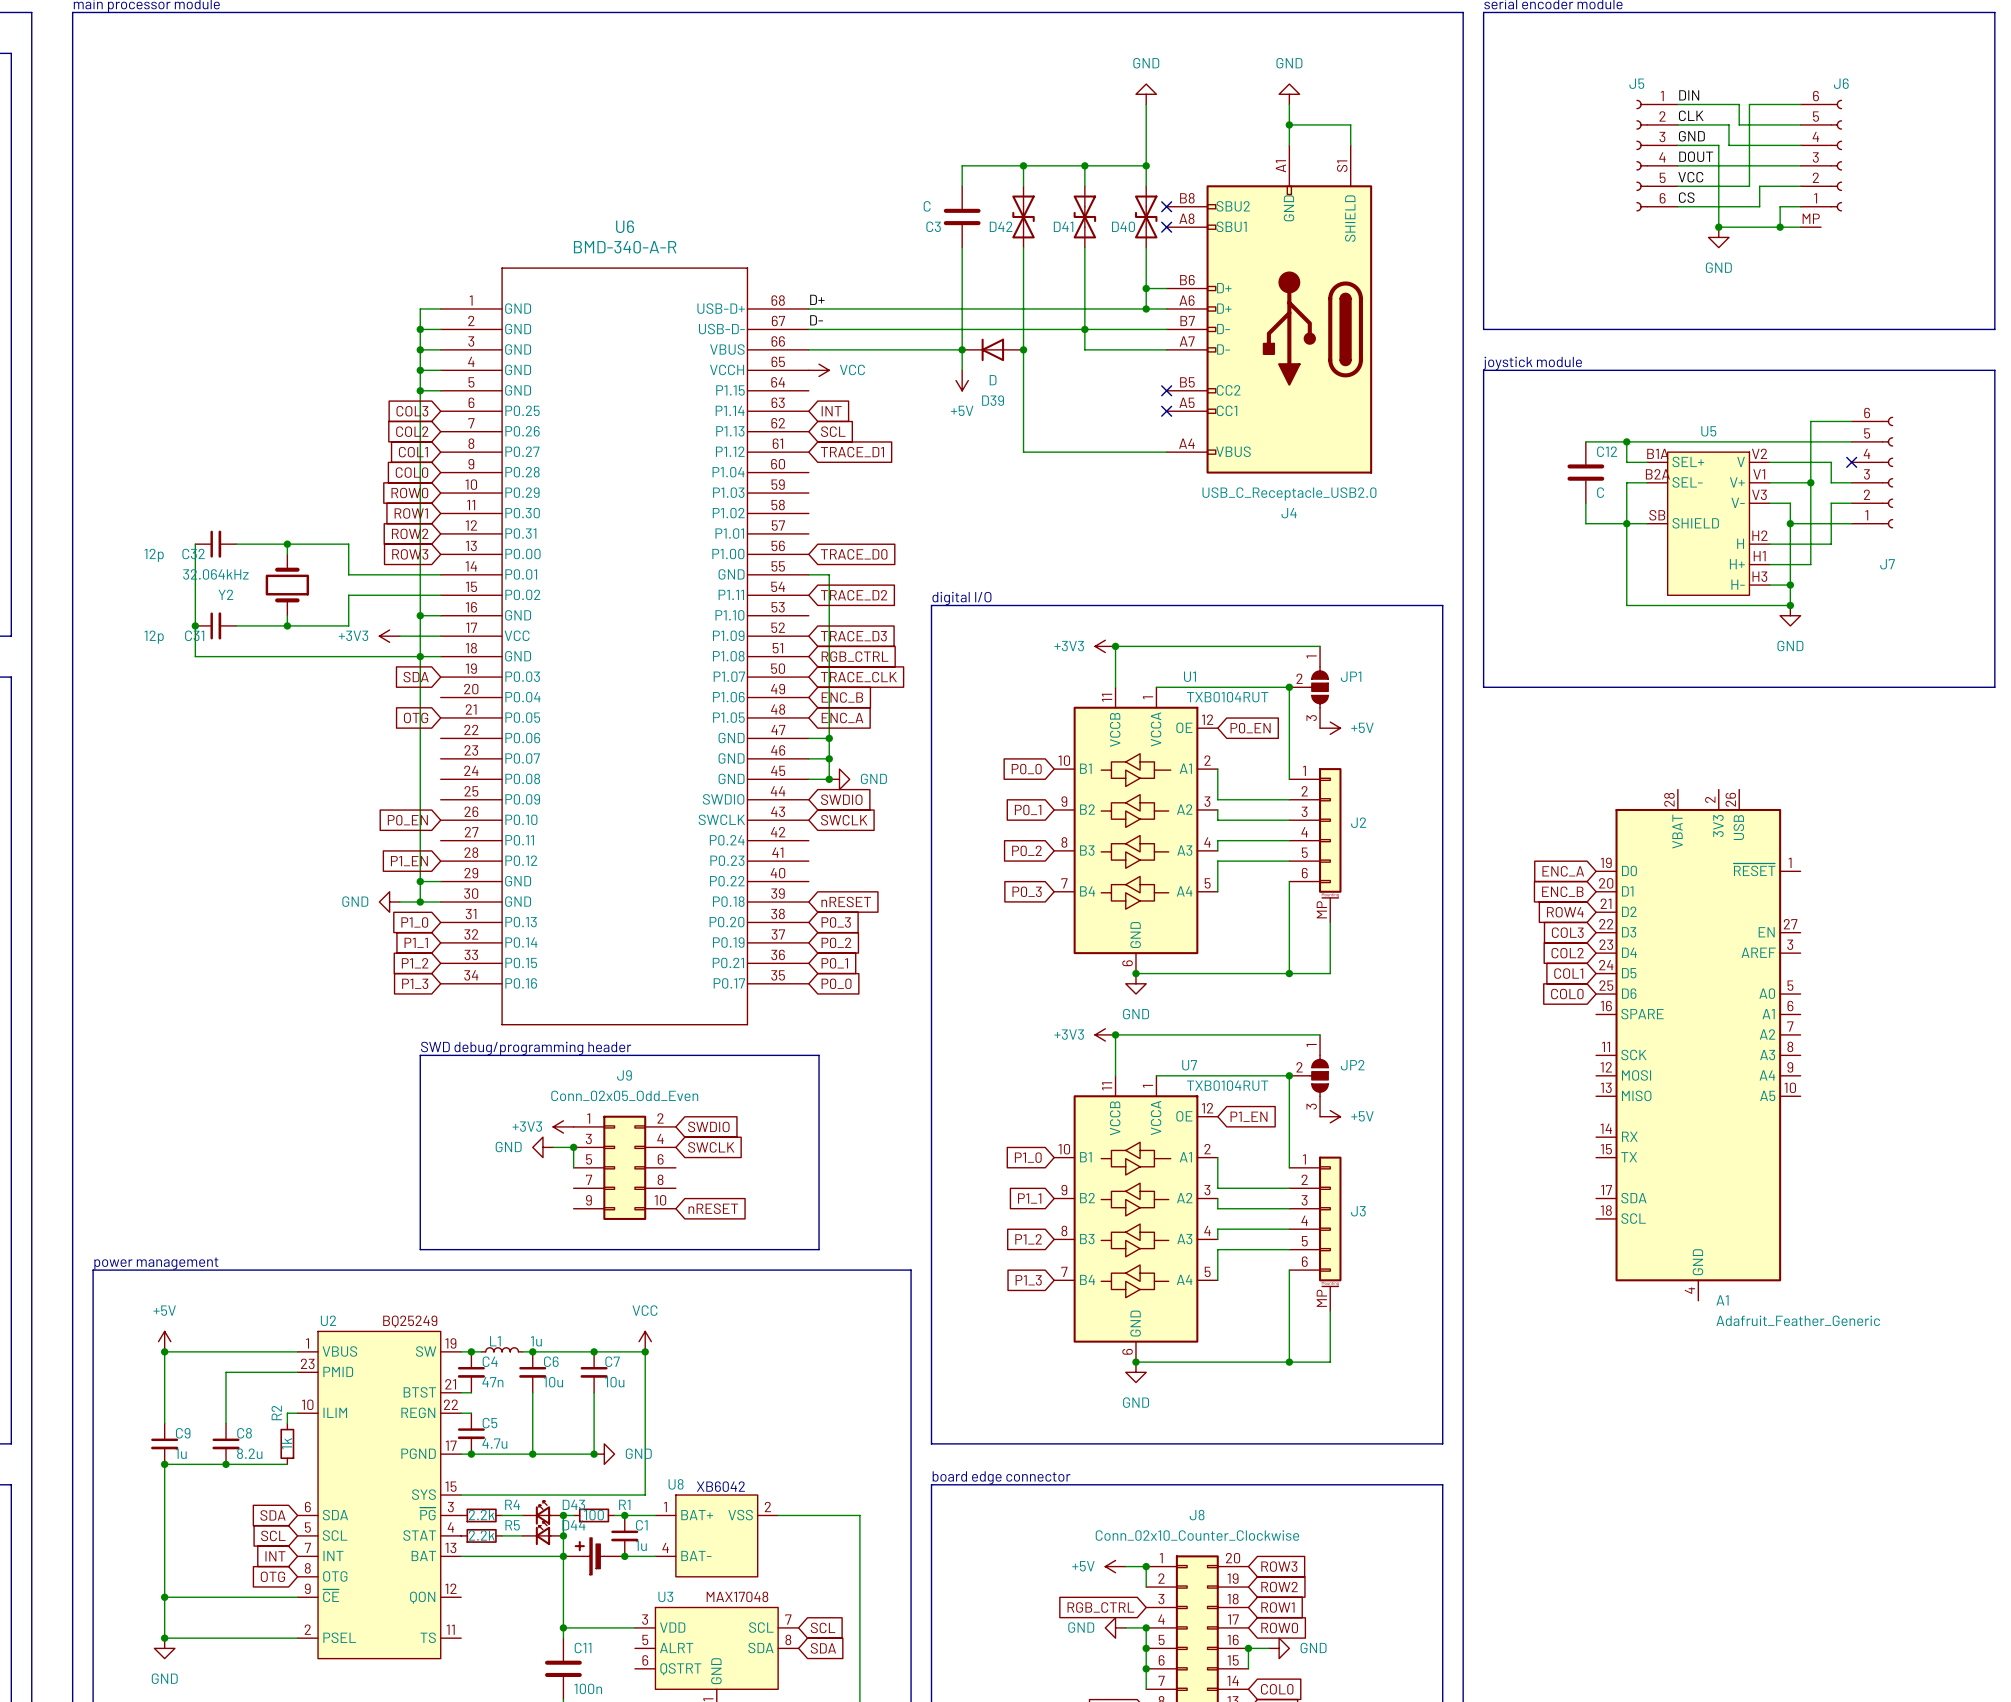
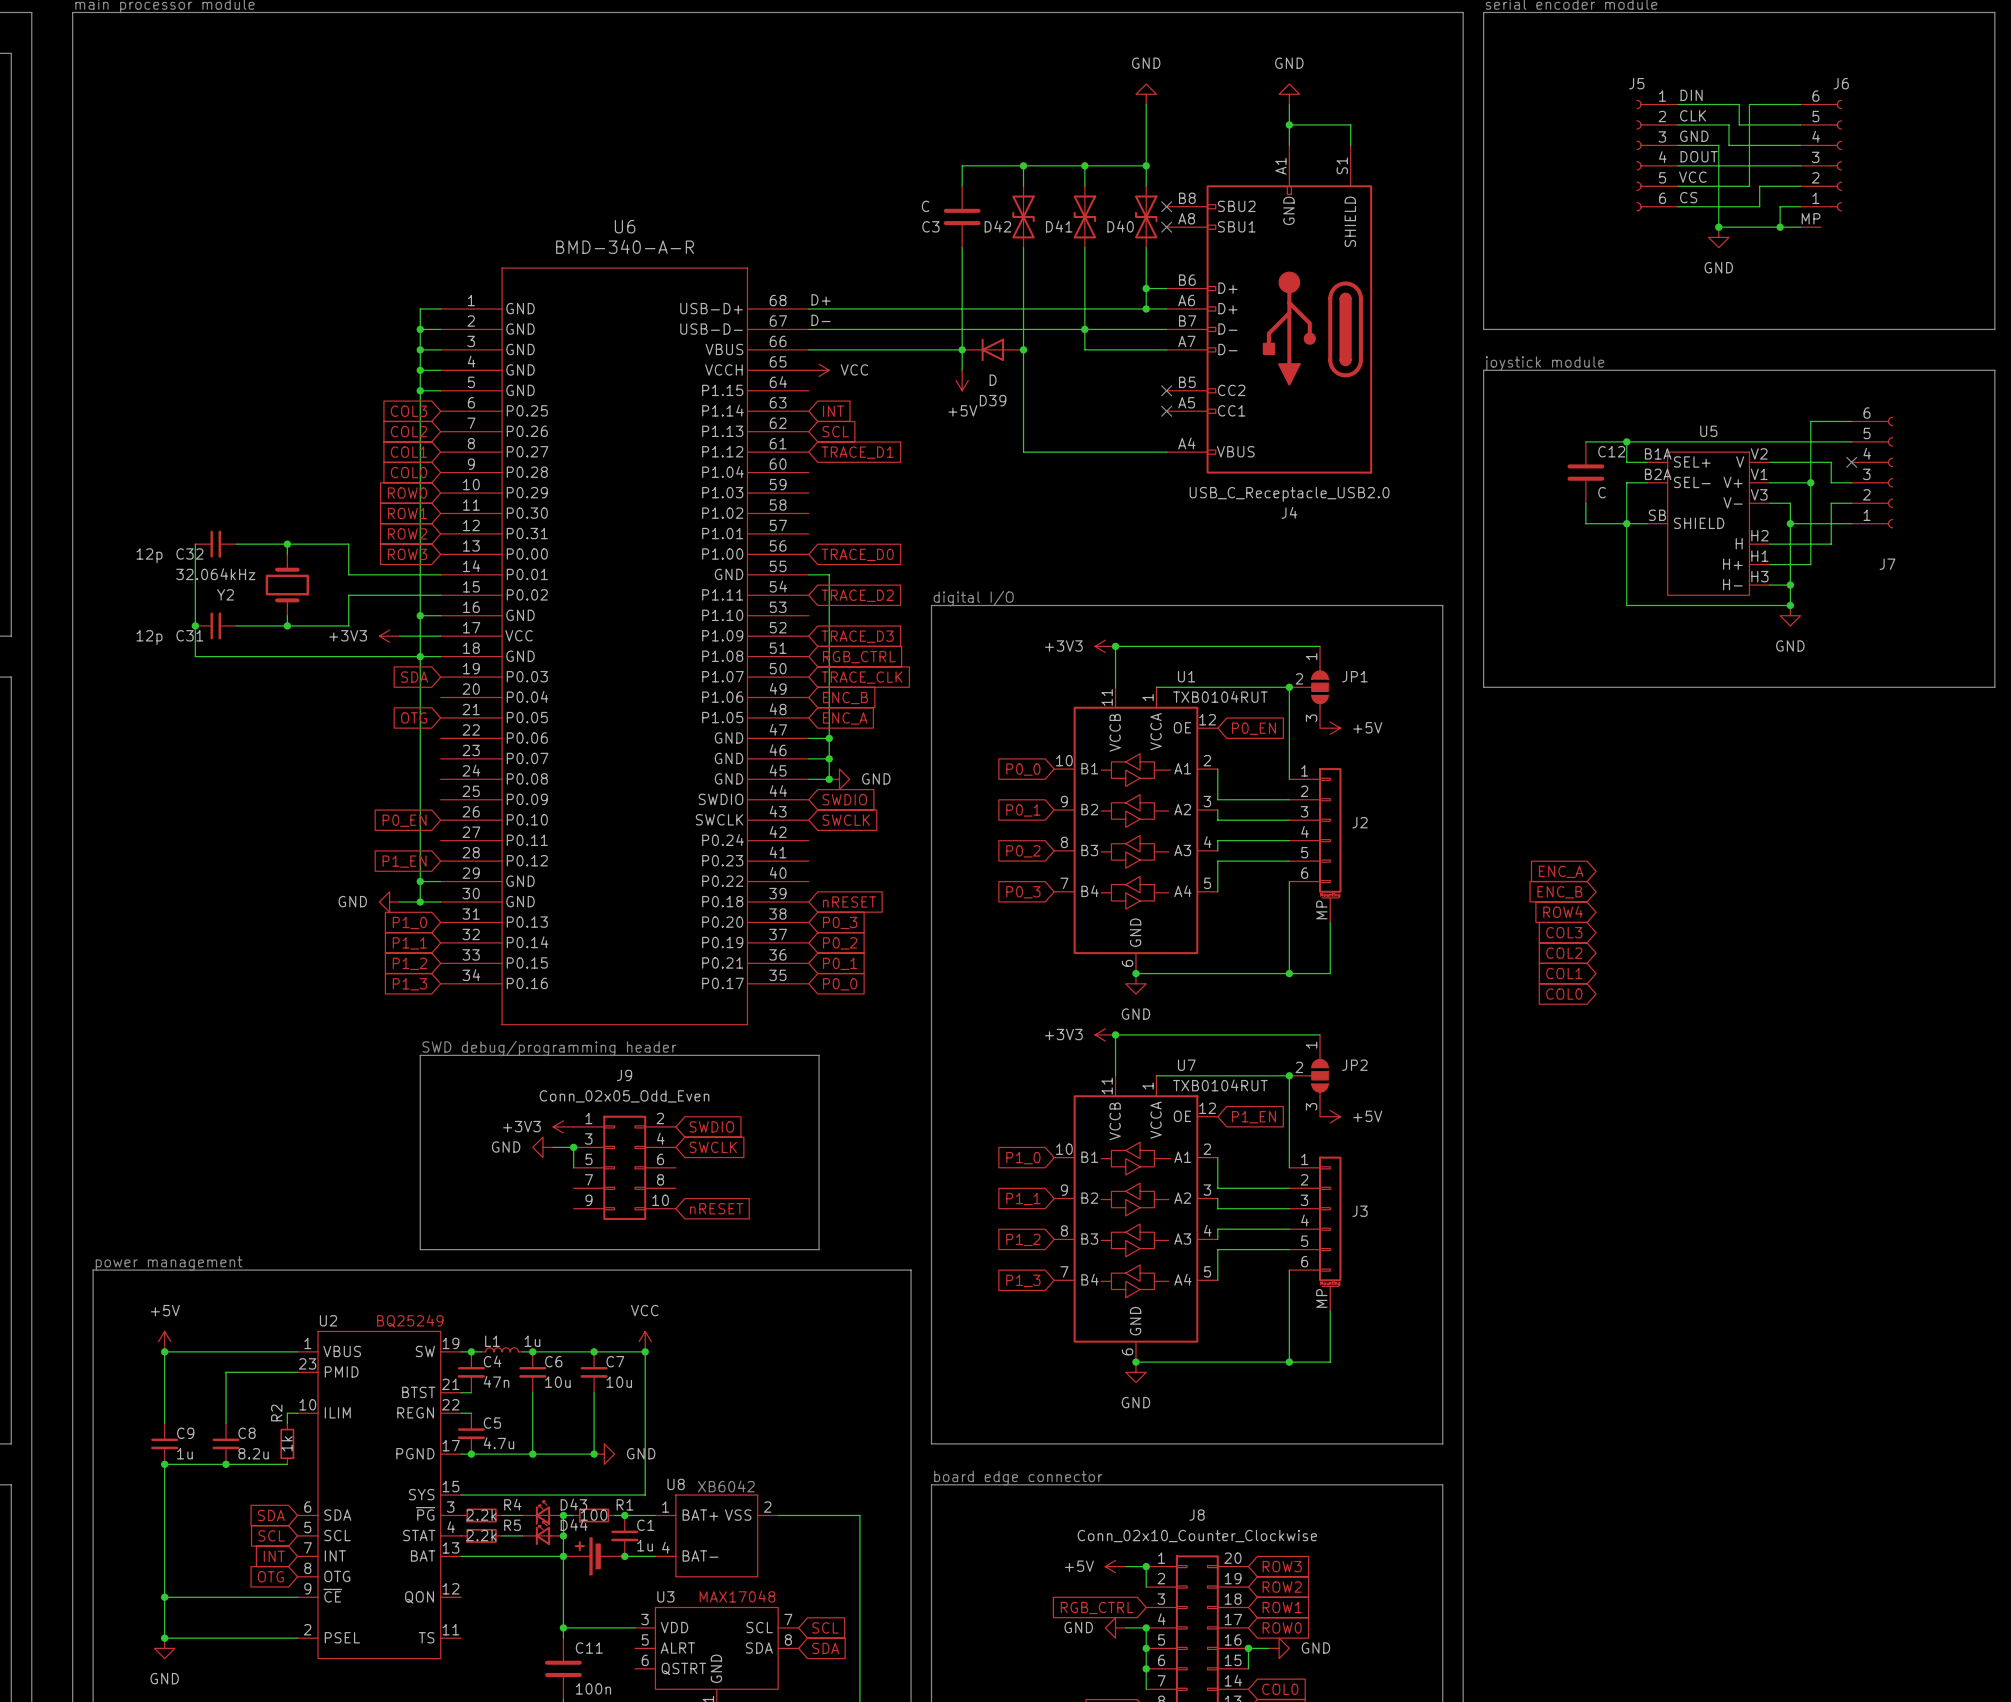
A1: Adafruit_Feather_Generic (1698, 1045) -> none

